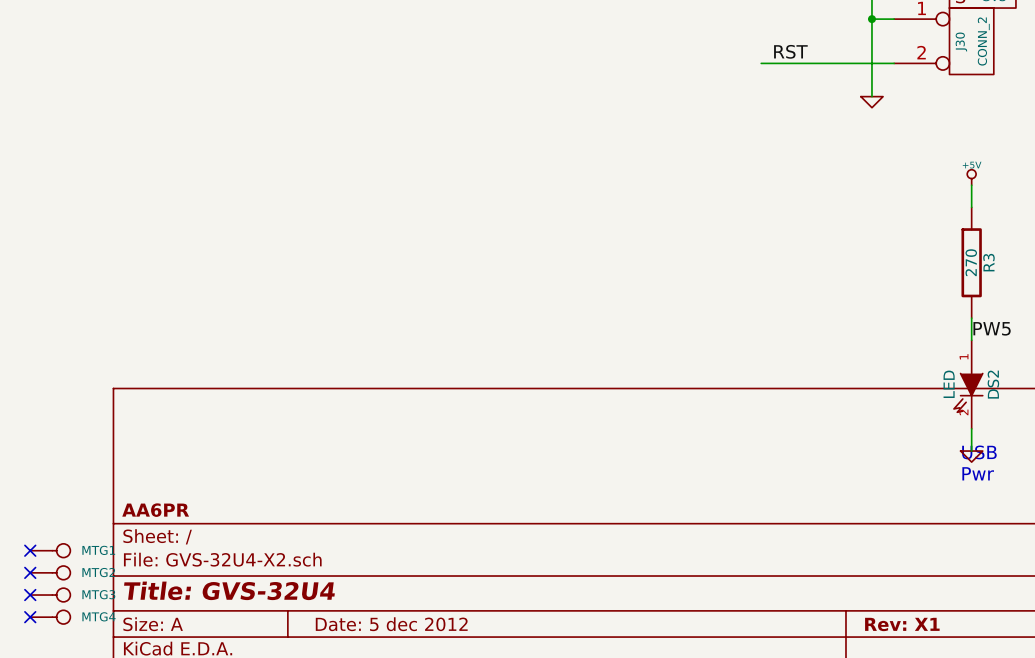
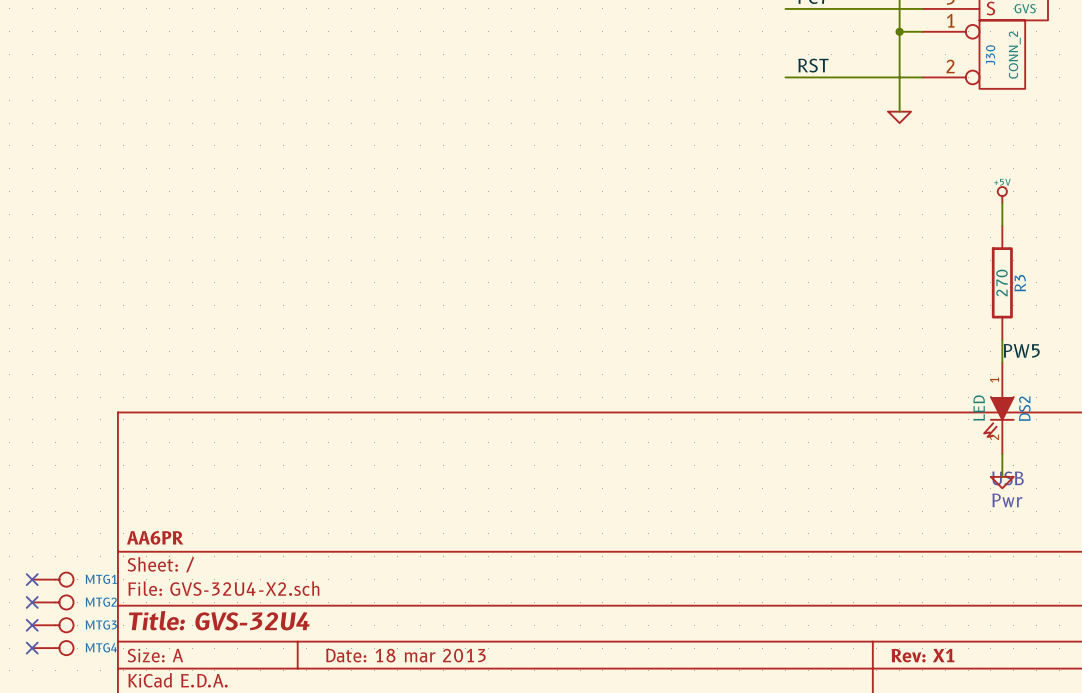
title block: Date: 5 dec 2012 (391, 624) -> Date: 18 mar 2013 (405, 655)

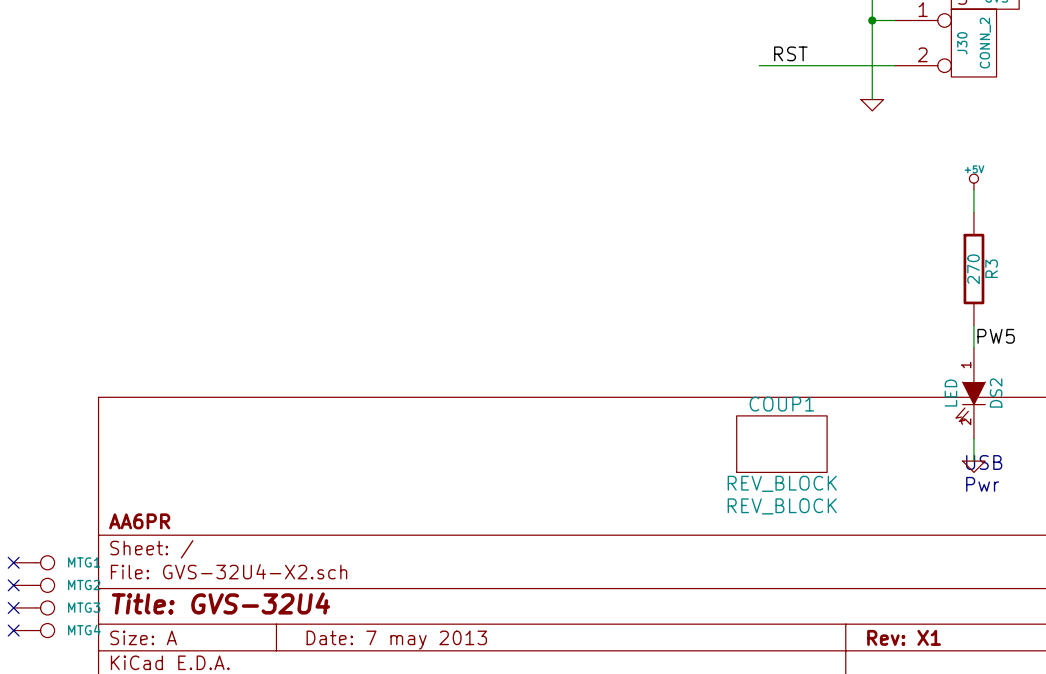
COUP1: none -> REV_BLOCK (781, 444)
title block: Date: 18 mar 2013 (405, 655) -> Date: 7 may 2013 (396, 640)

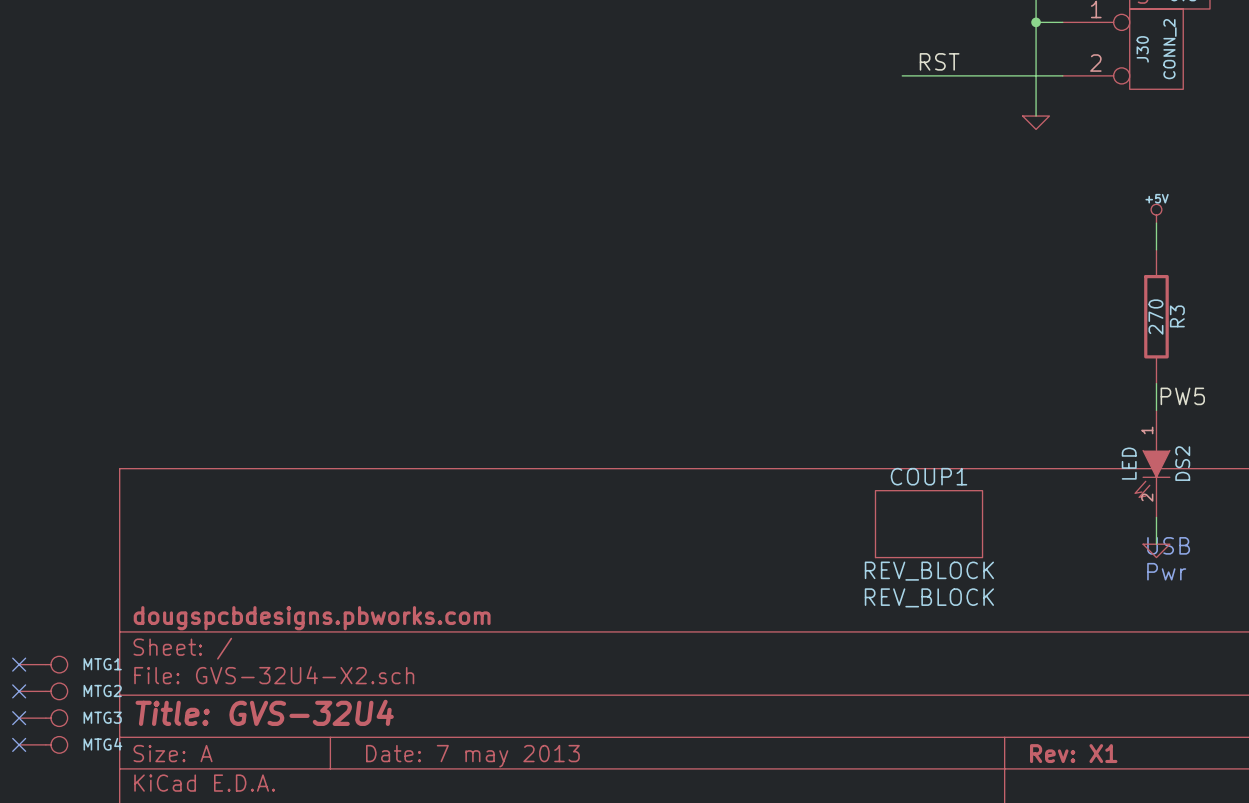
title block: AA6PR (139, 521) -> dougspcbdesigns.pbworks.com (312, 618)

